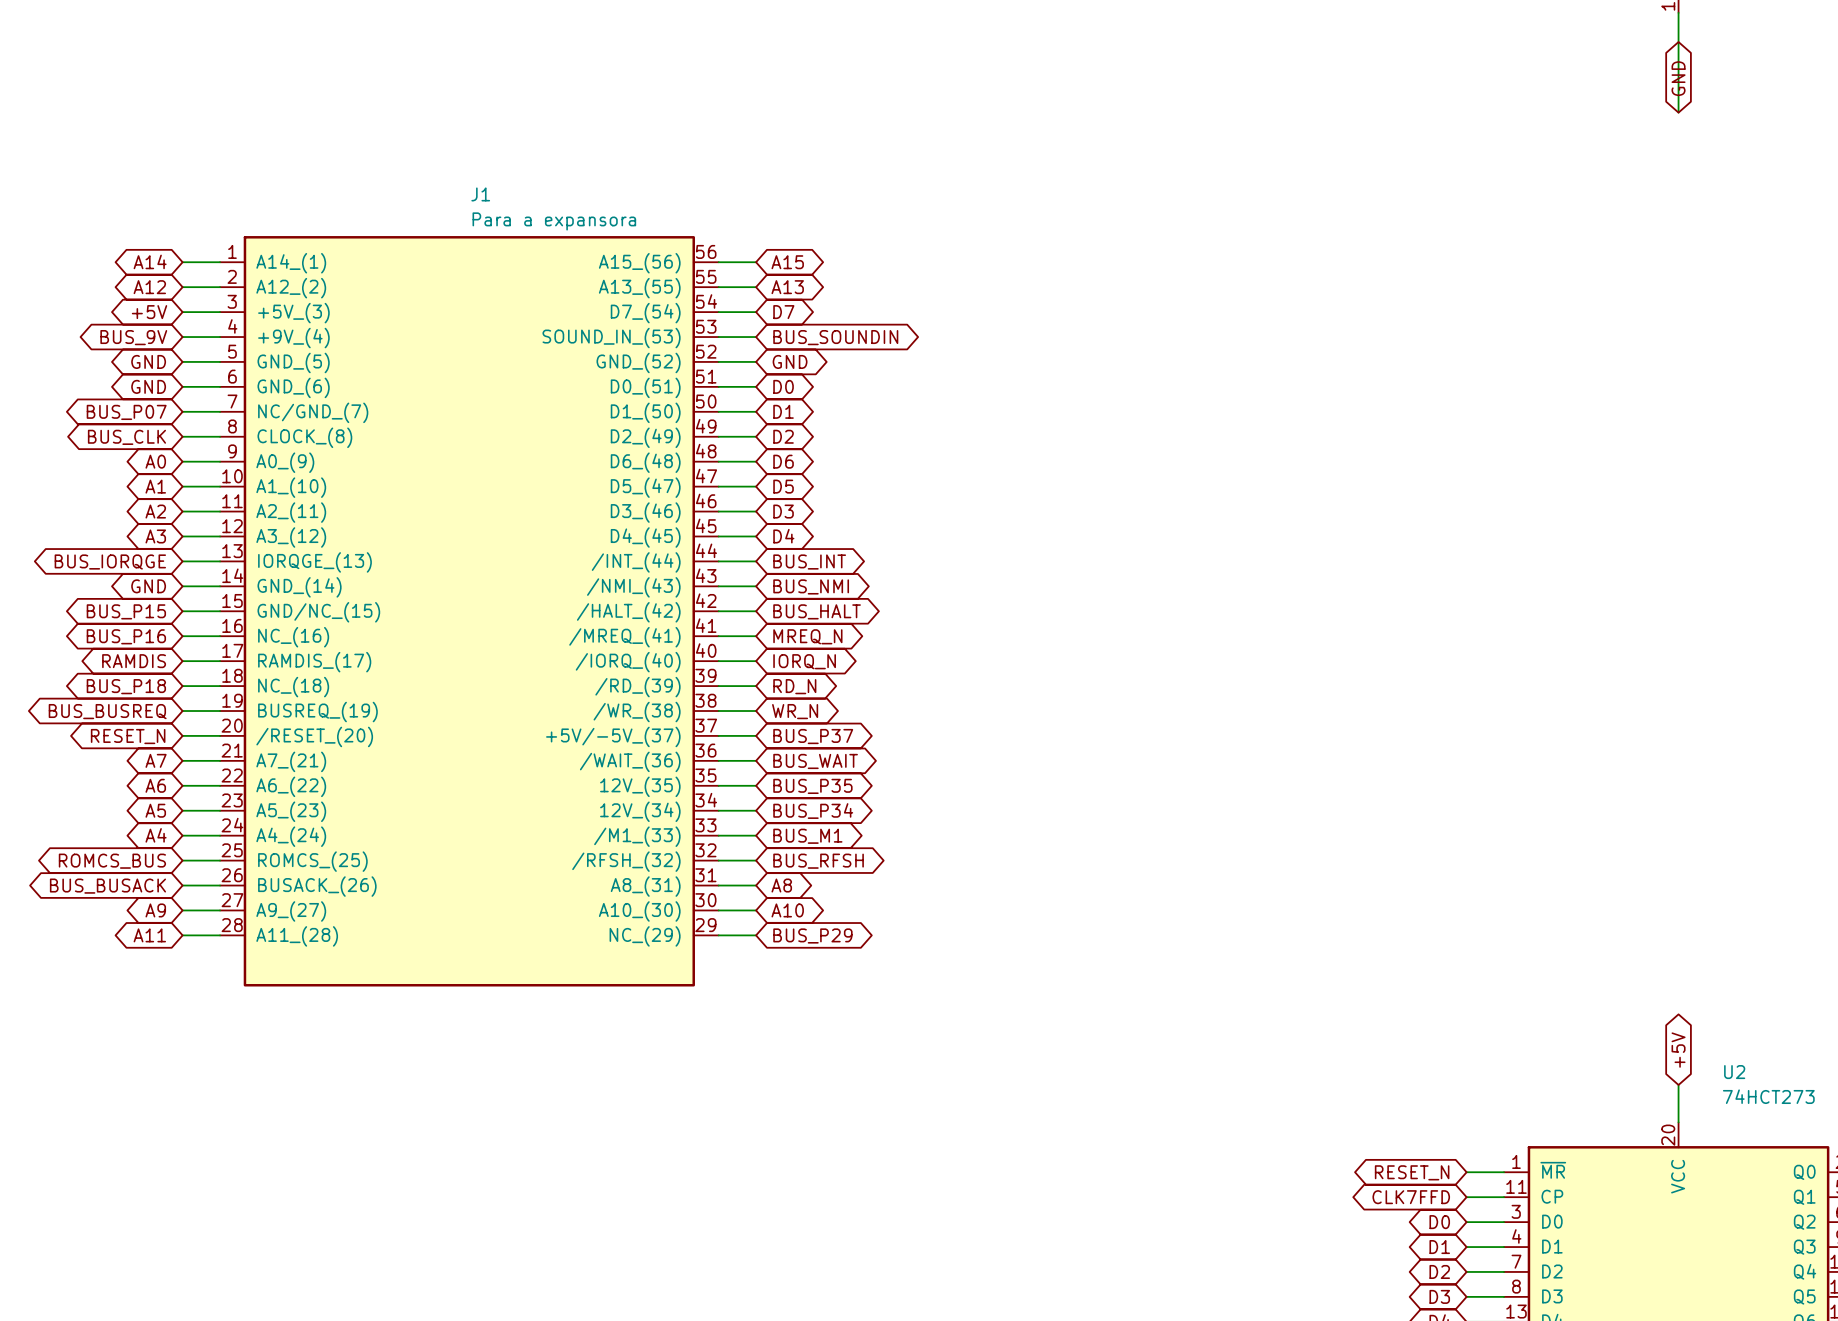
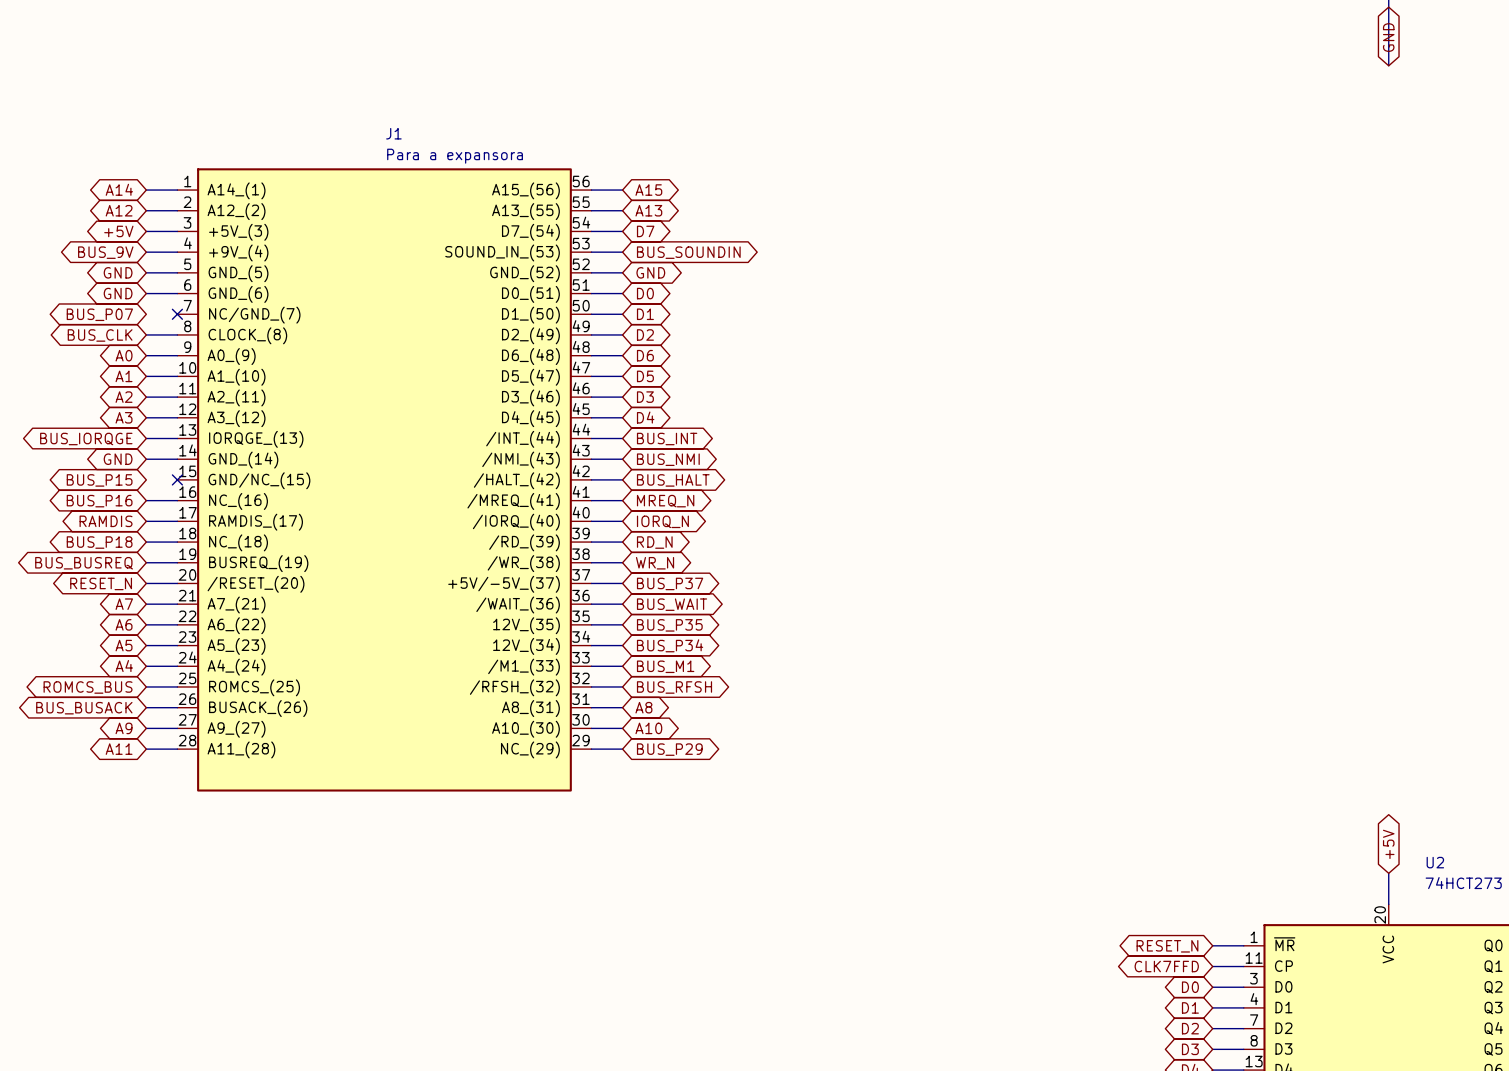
wire: (182, 411) (220, 411) -> none
no-connect mark: none -> (177, 314)
wire: (182, 611) (220, 611) -> none
no-connect mark: none -> (177, 479)

